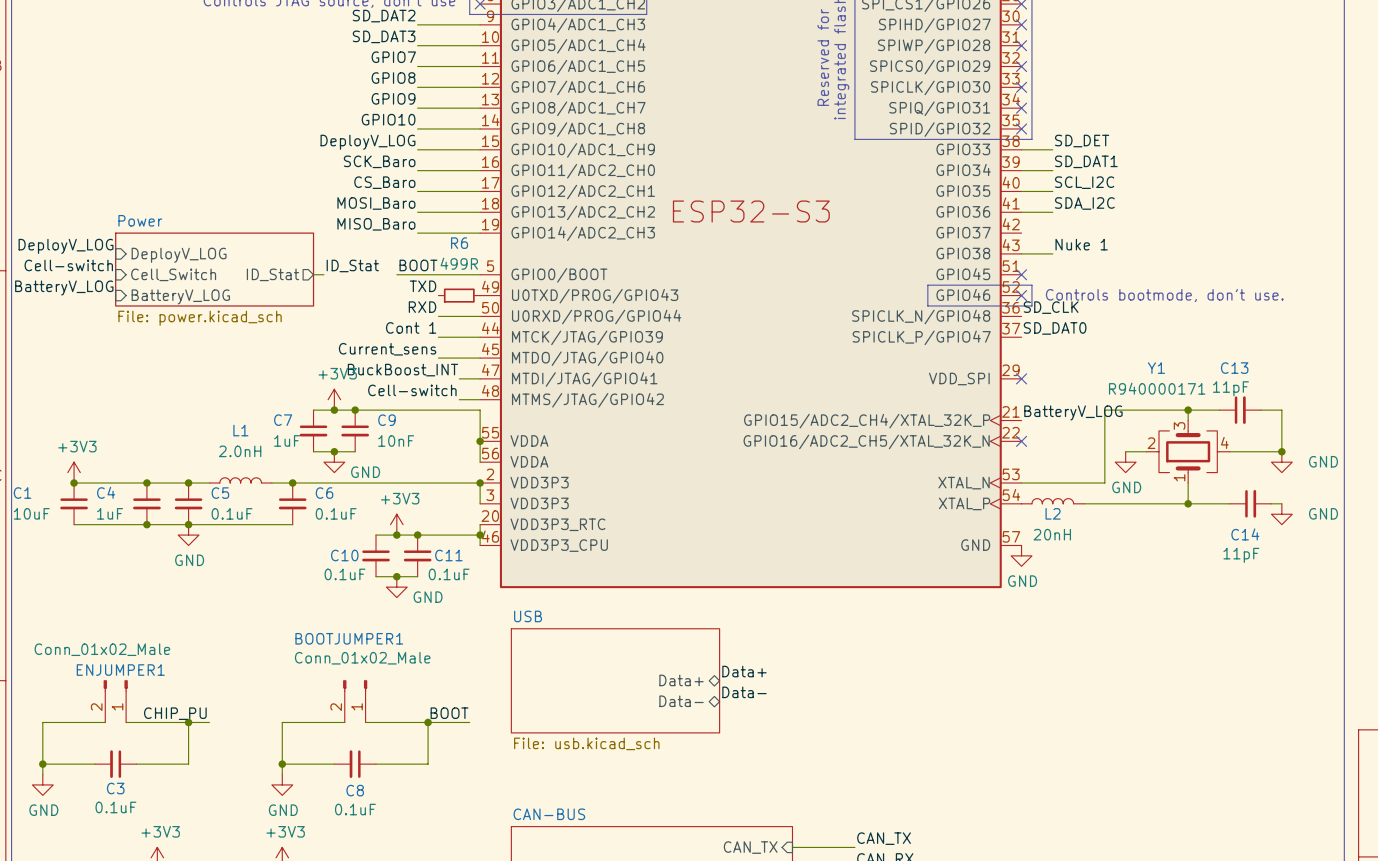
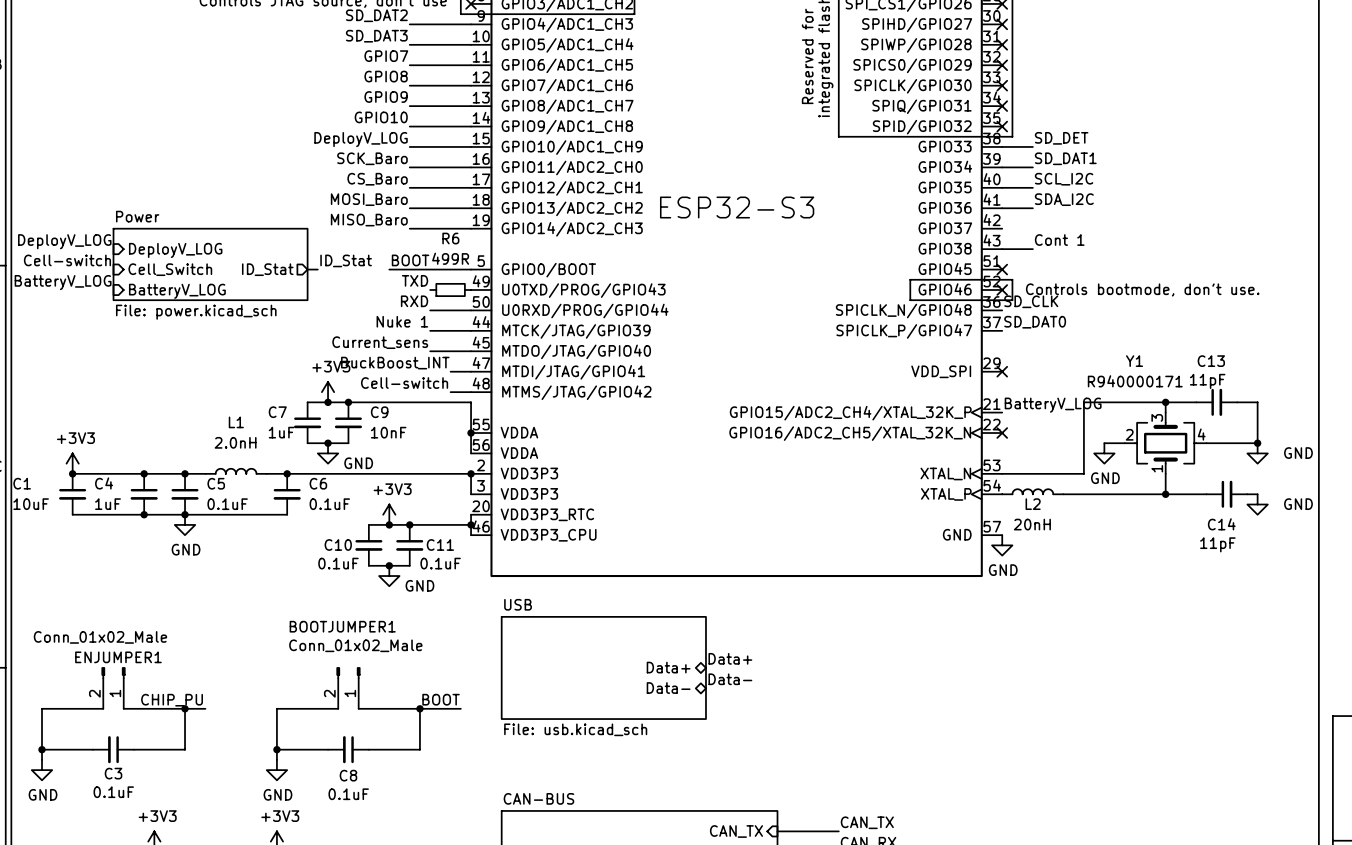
label: Nuke 1 (1081, 244) -> Cont 1 (1059, 240)
label: Cont 1 (411, 327) -> Nuke 1 (402, 321)

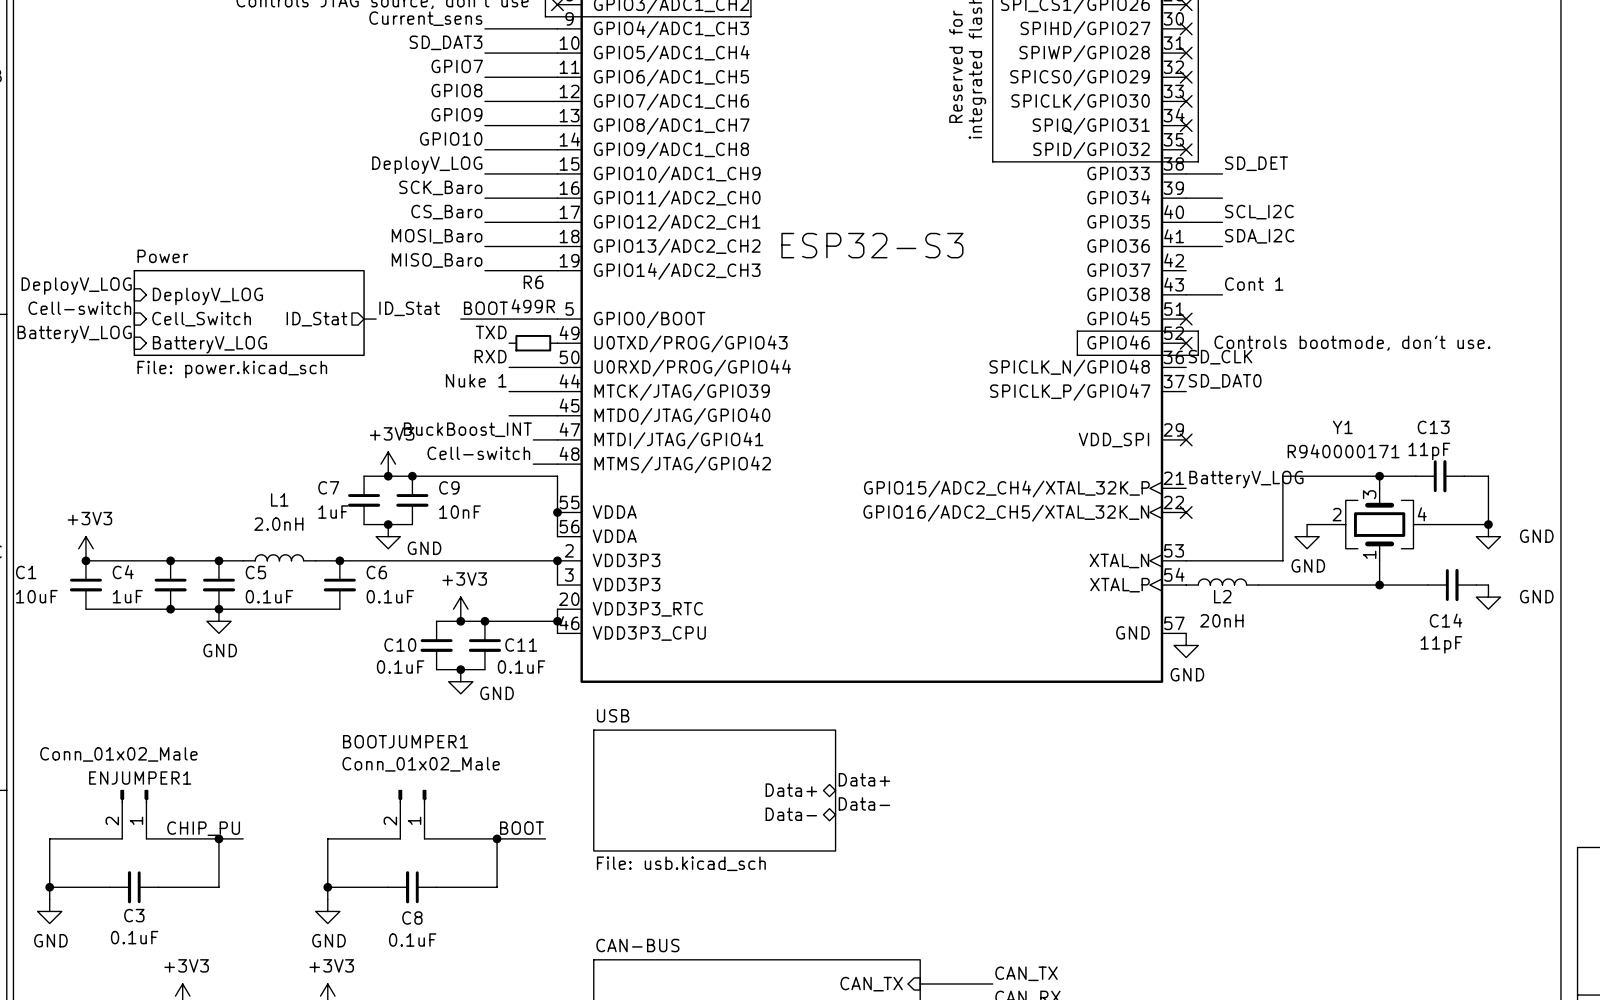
label: SD_DAT2 (376, 15) -> Current_sens (425, 18)
label: SD_DAT1 (1065, 158) -> none
label: Current_sens (380, 342) -> none

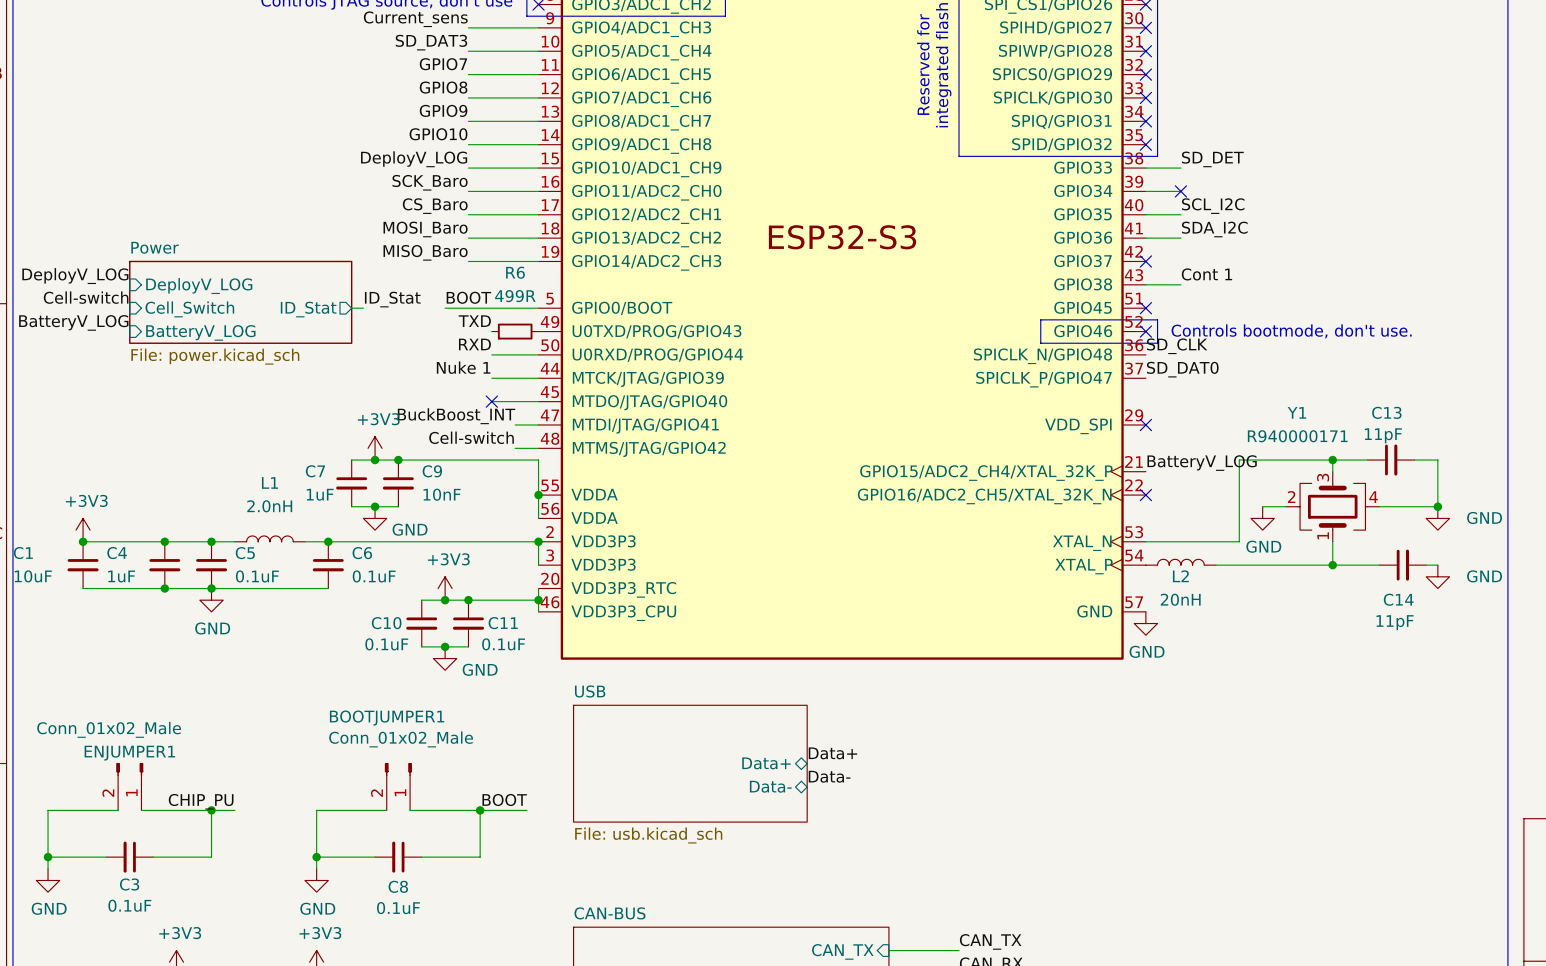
no-connect mark: none -> (1180, 191)
no-connect mark: none -> (1145, 261)
no-connect mark: none -> (491, 401)

